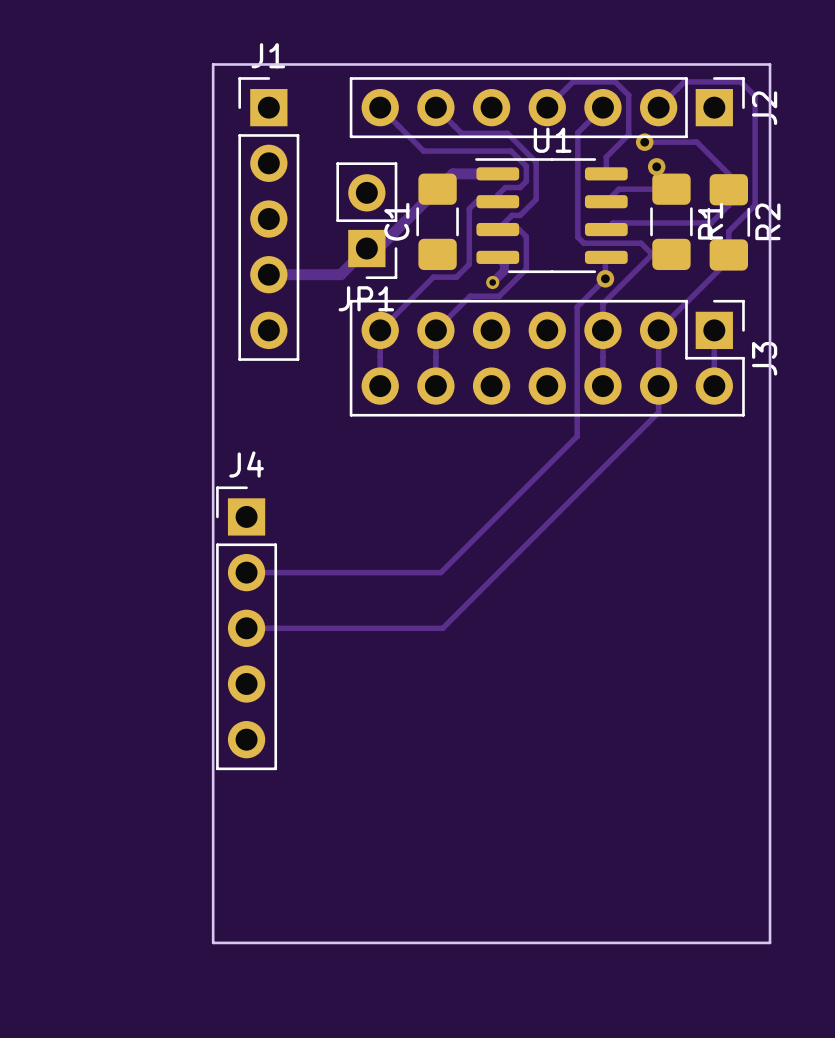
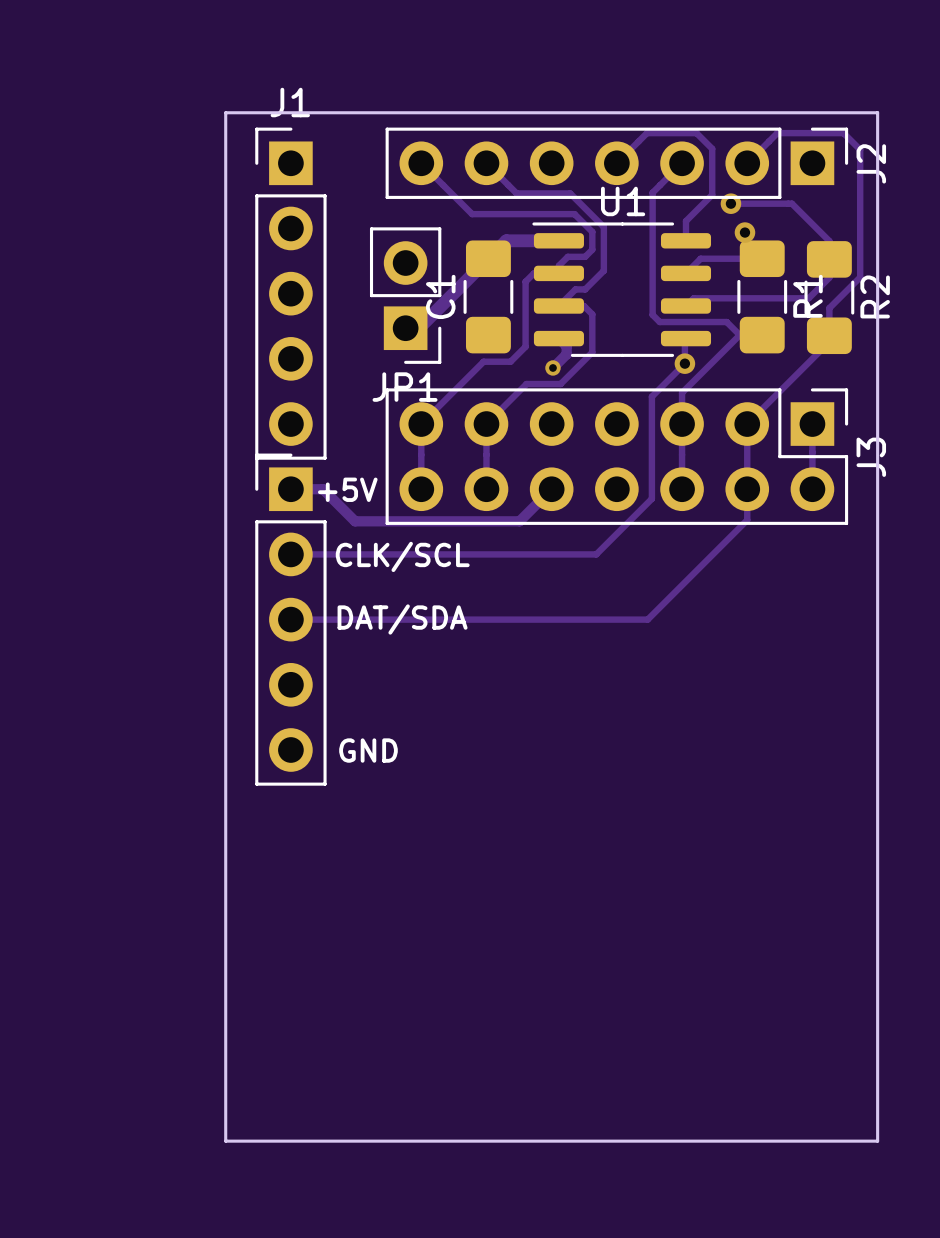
track: (366, 248) (340, 274) (268, 274) -> none
track: none -> (290, 489) (322, 489) (355, 521) (519, 521) (551, 489)
text: none -> +5V (347, 489)
track: (577, 394) (577, 436) (440, 572) (246, 572) -> (651, 498) (596, 554) (290, 554)
text: none -> CLK/SCL (402, 556)
part: none -> (290, 619)
text: none -> DAT/SDA (402, 619)
track: (573, 497) (442, 628) (246, 628) -> (647, 619) (290, 619)
text: none -> GND (368, 750)
J4: (246, 628) -> none

